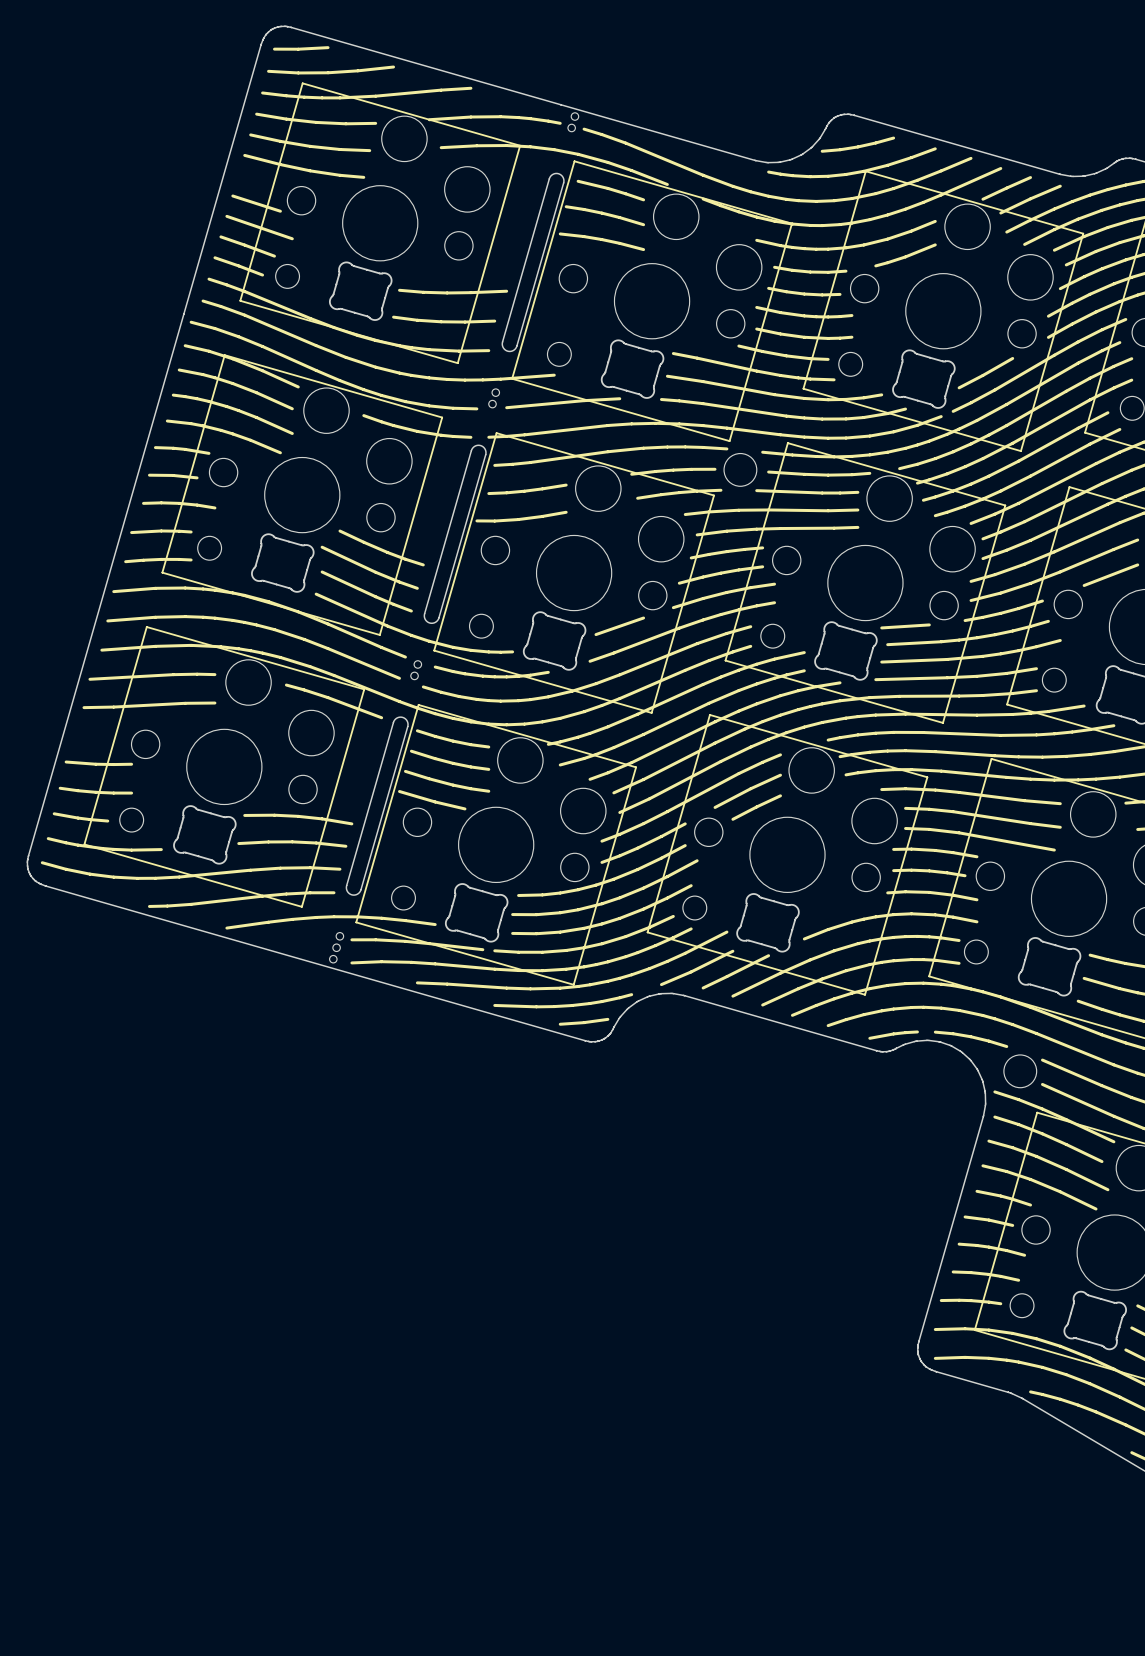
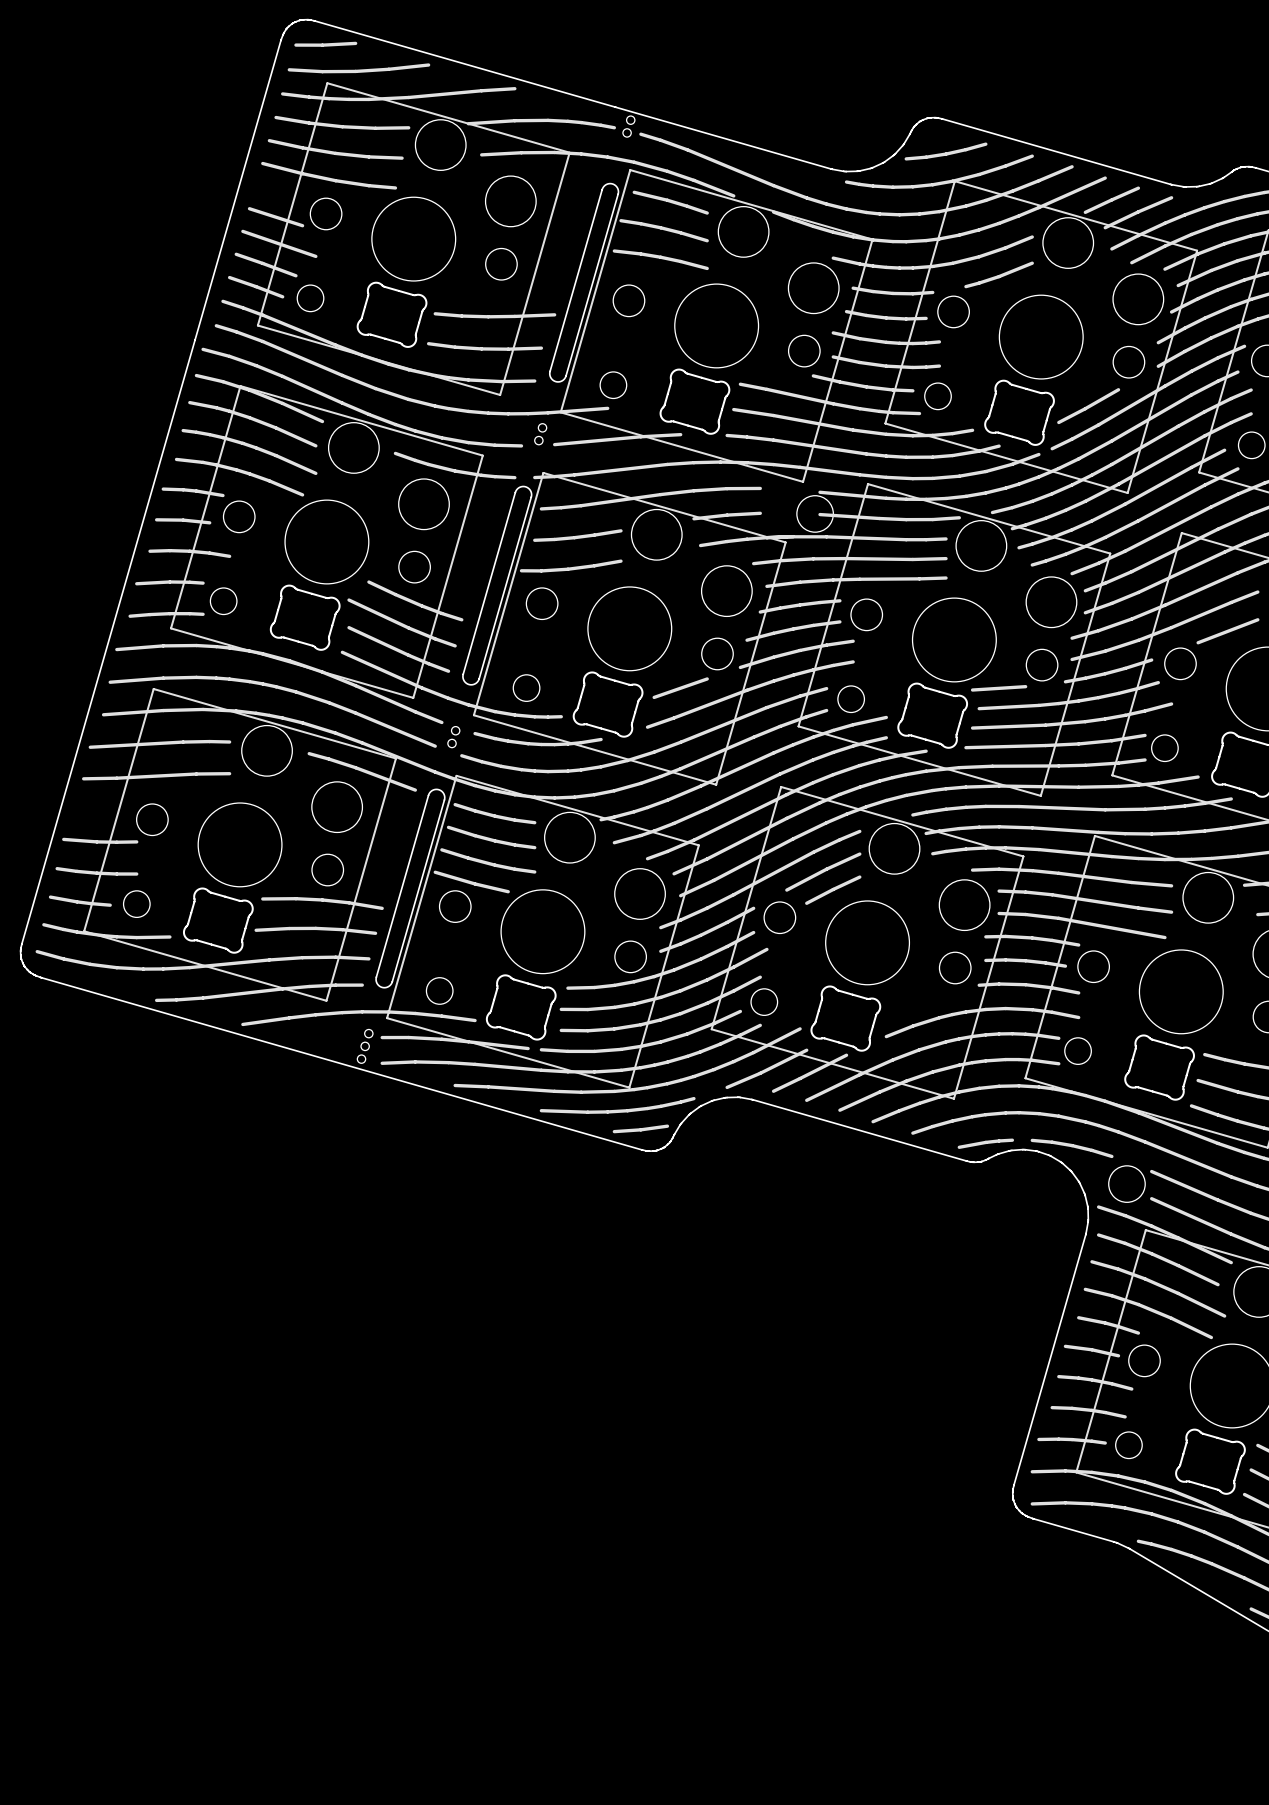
line: (959, 429) (917, 444) (869, 454) (816, 456) (762, 452) -> (1058, 468) (1005, 488) (946, 498) (886, 498) (820, 492)
line: (726, 448) (685, 446) (643, 448) (530, 462) -> (760, 488) (693, 490) (581, 505)
line: (715, 469) (673, 470) (631, 474) -> (760, 513) (693, 518)
line: (768, 472) (828, 475) (869, 473) -> (820, 514) (906, 519) (959, 517)
line: (756, 490) (822, 493) -> (766, 537) (826, 536) (906, 539)

